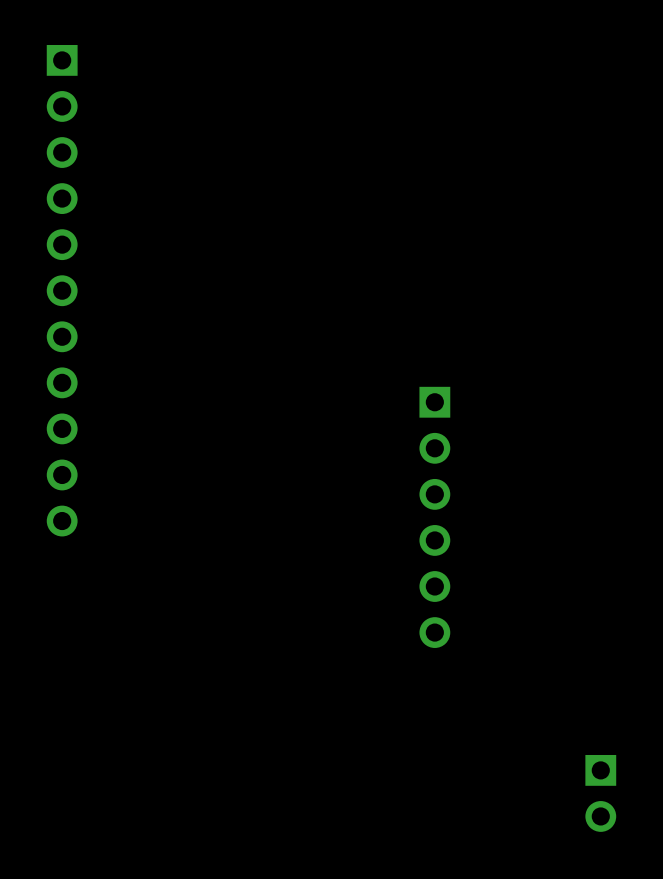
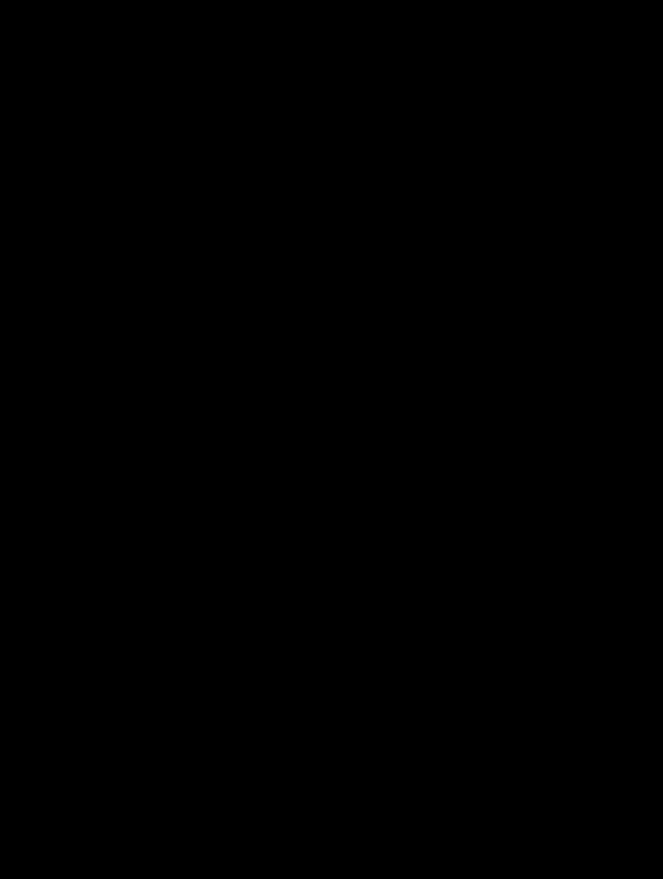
part: (62, 290) -> none
part: (434, 517) -> none
part: (600, 793) -> none

